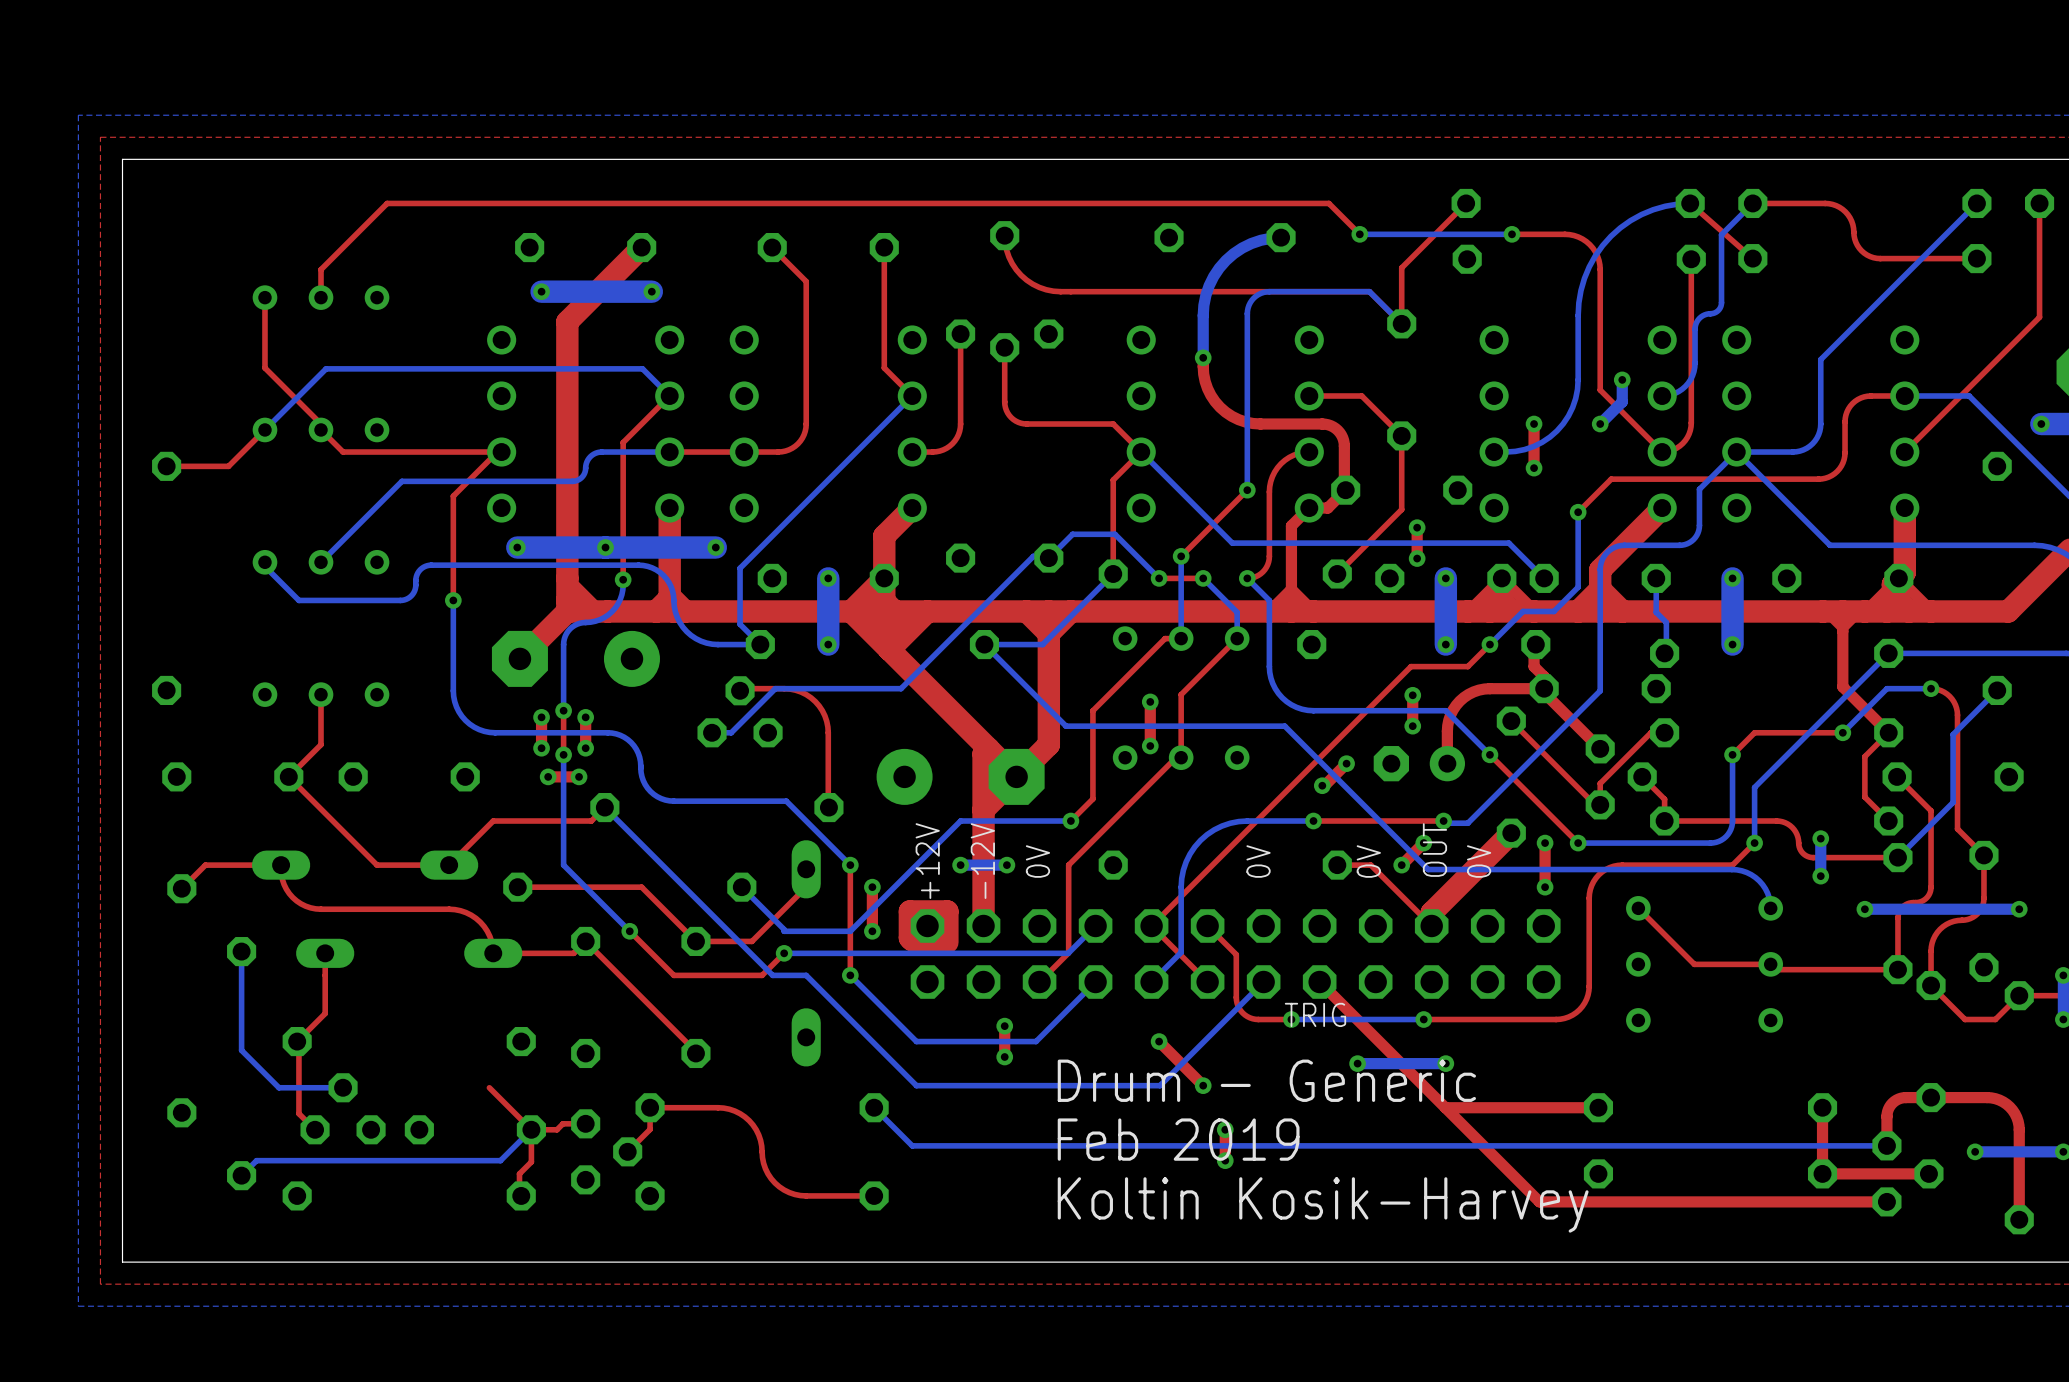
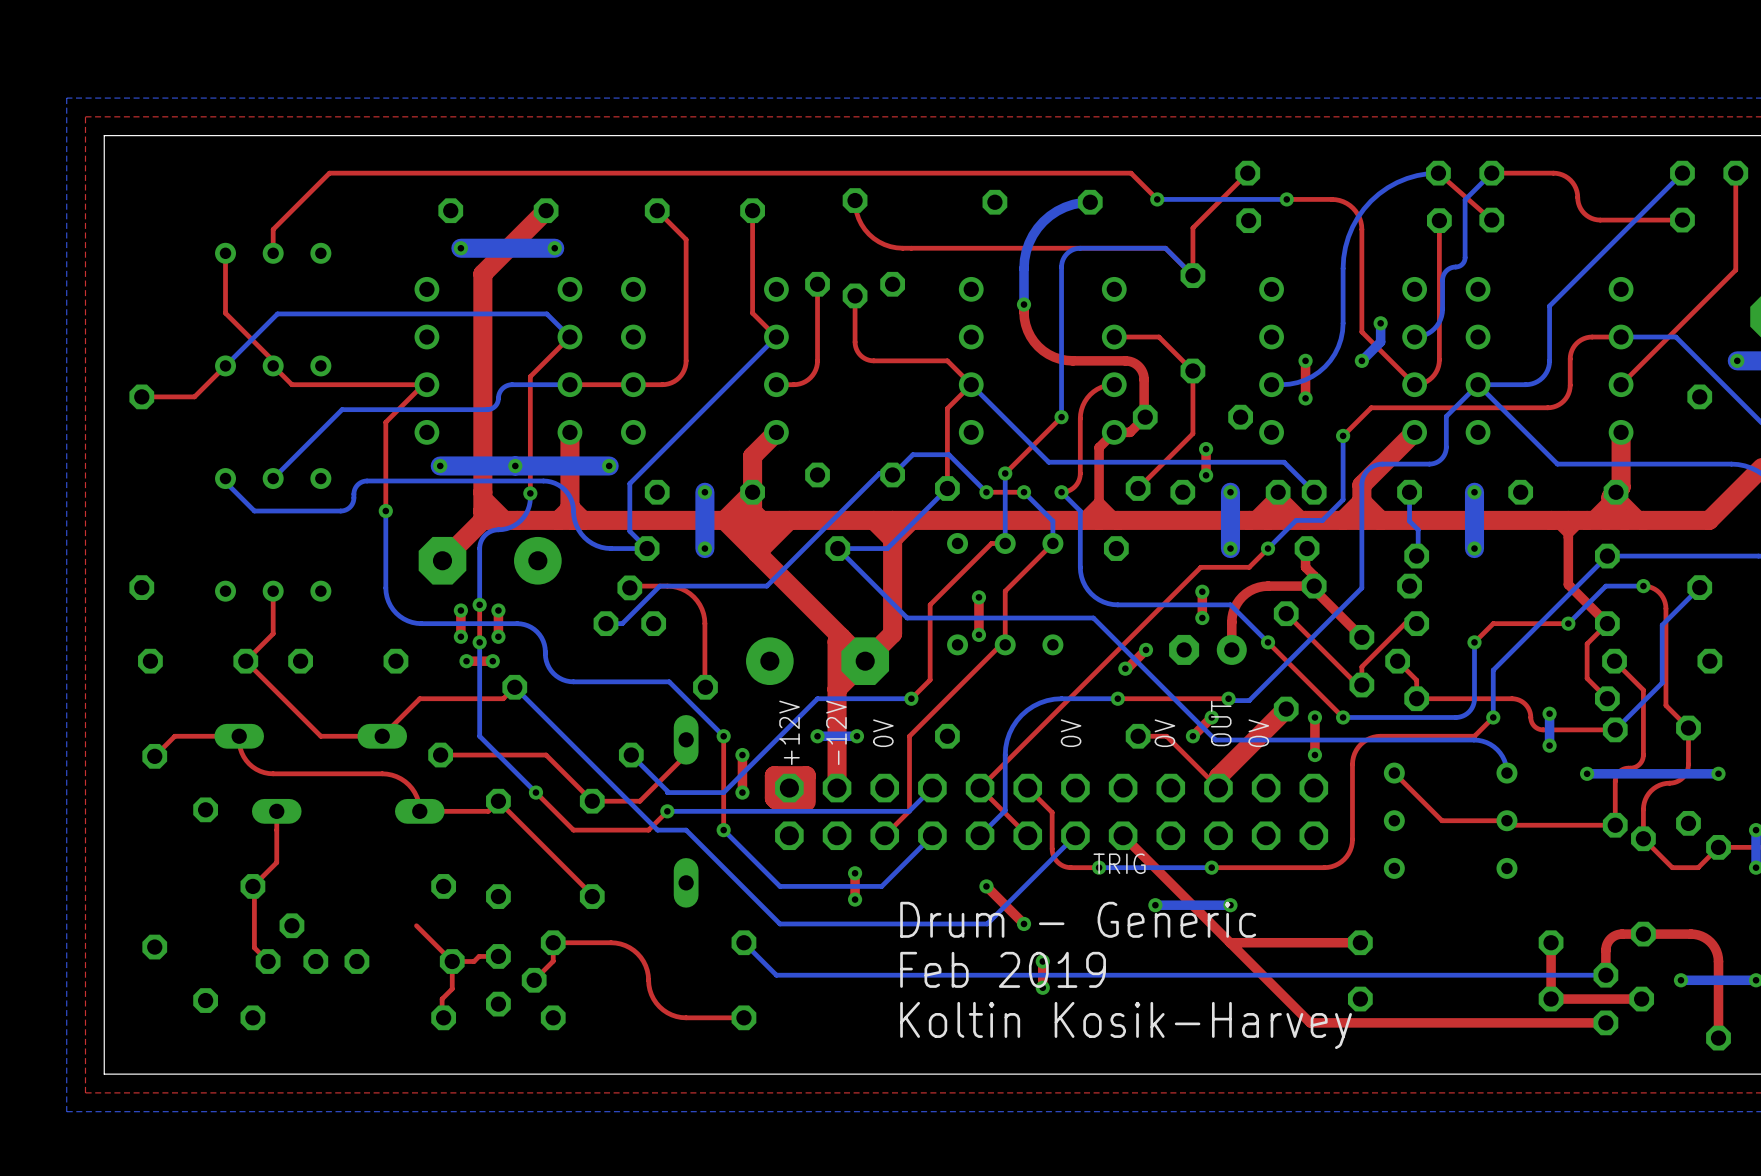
bottom track: (241, 951) (241, 1050) (278, 1087) (343, 1087) -> none
bottom track: (531, 1129) (500, 1160) (256, 1160) (241, 1175) -> none

